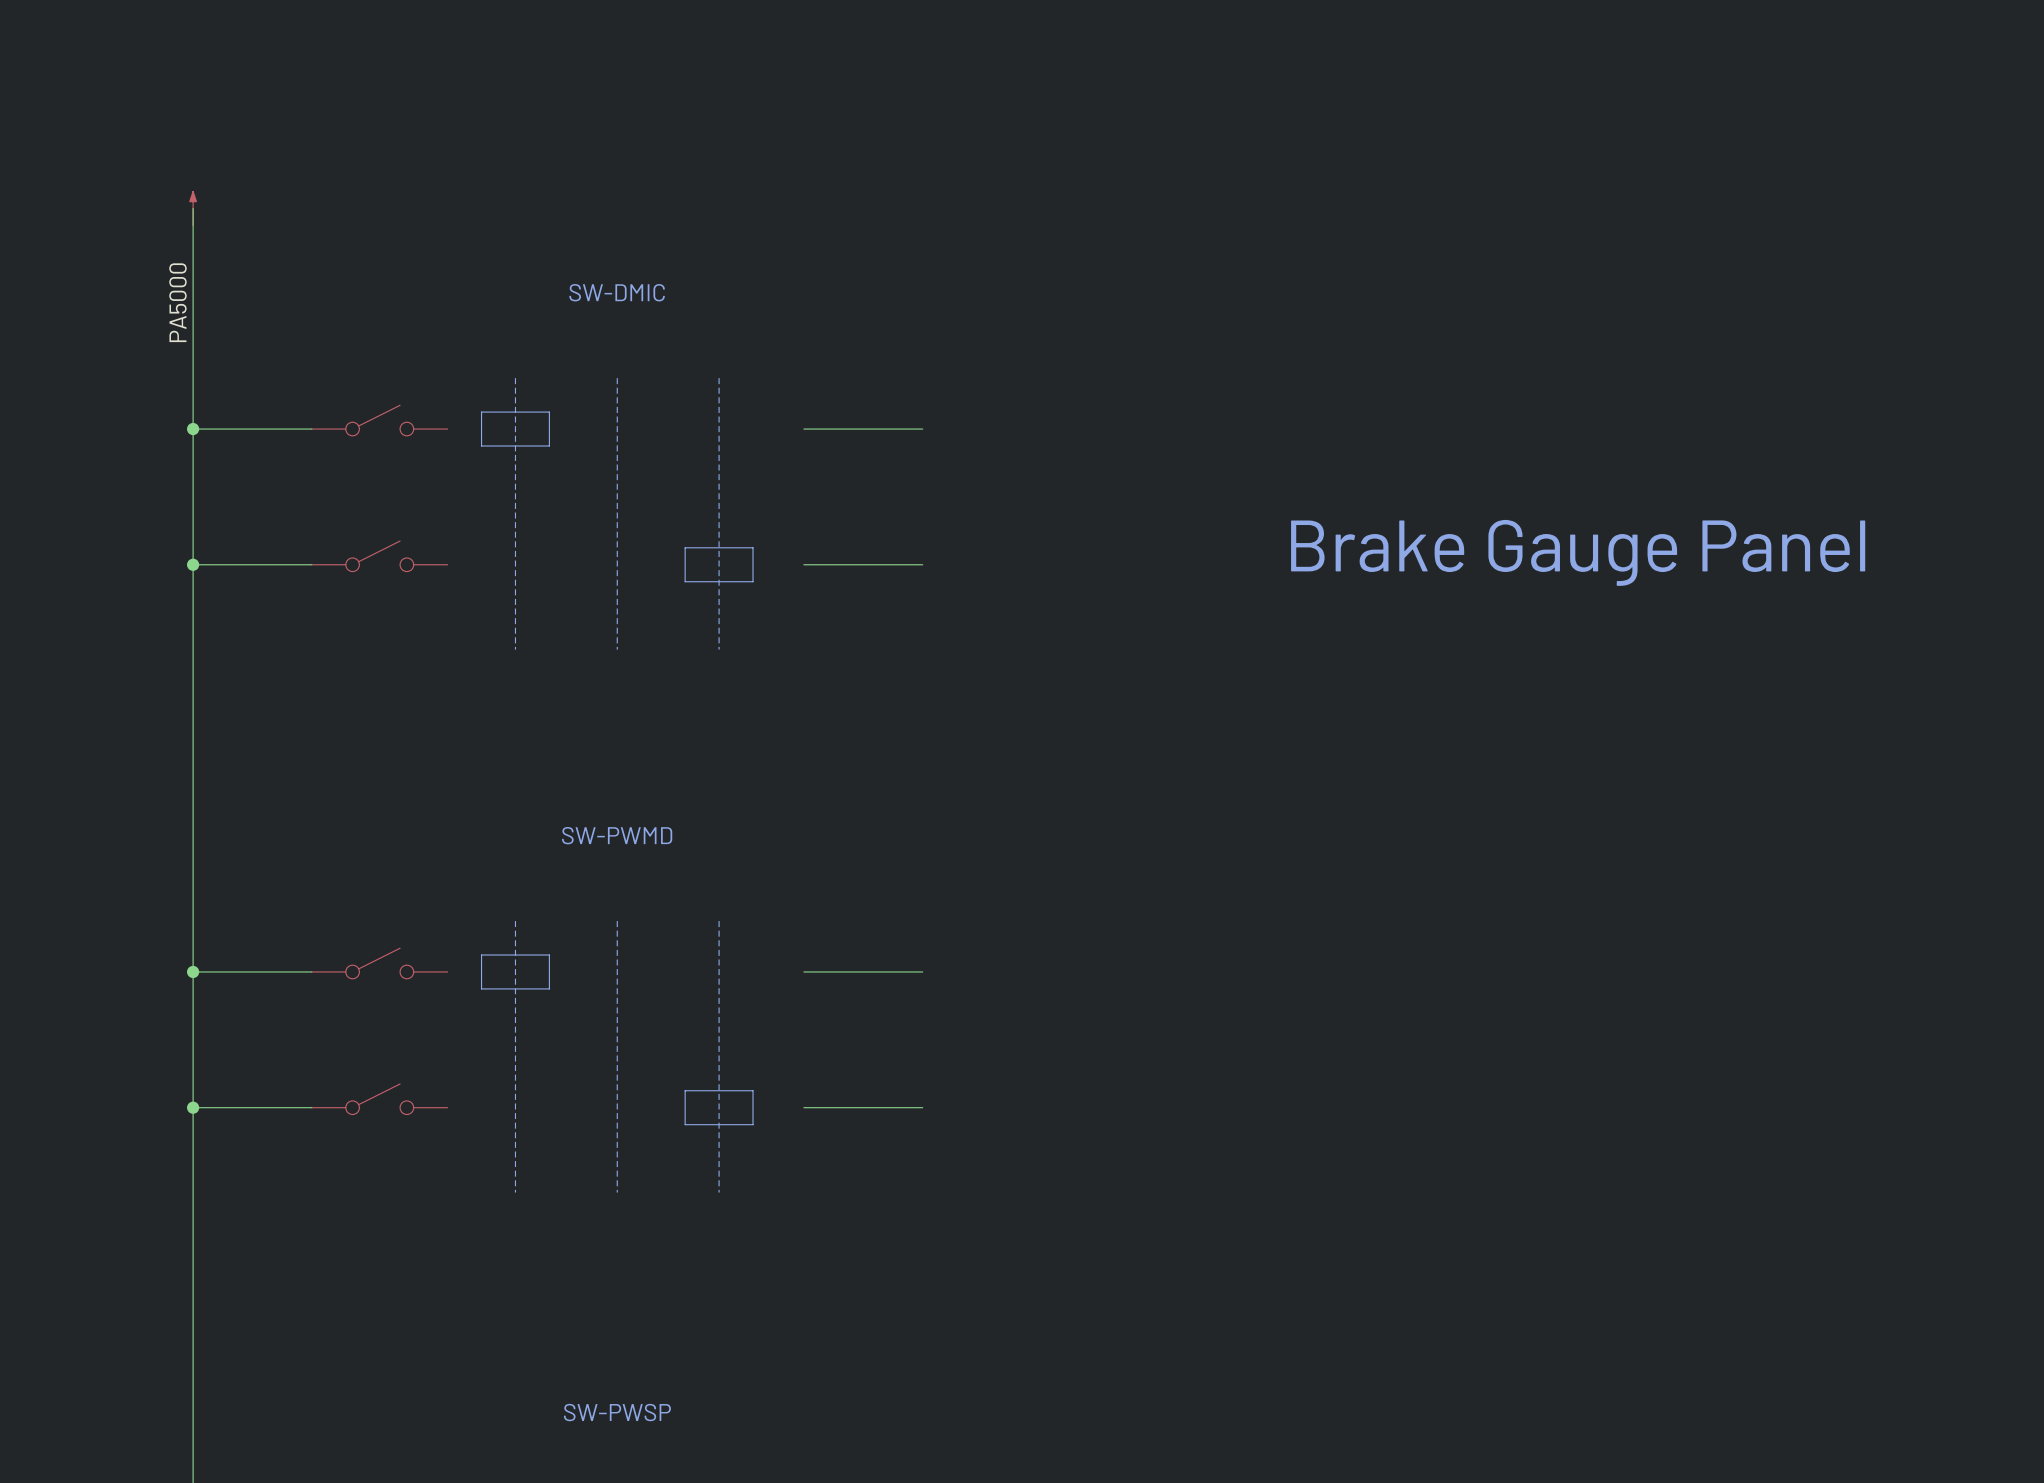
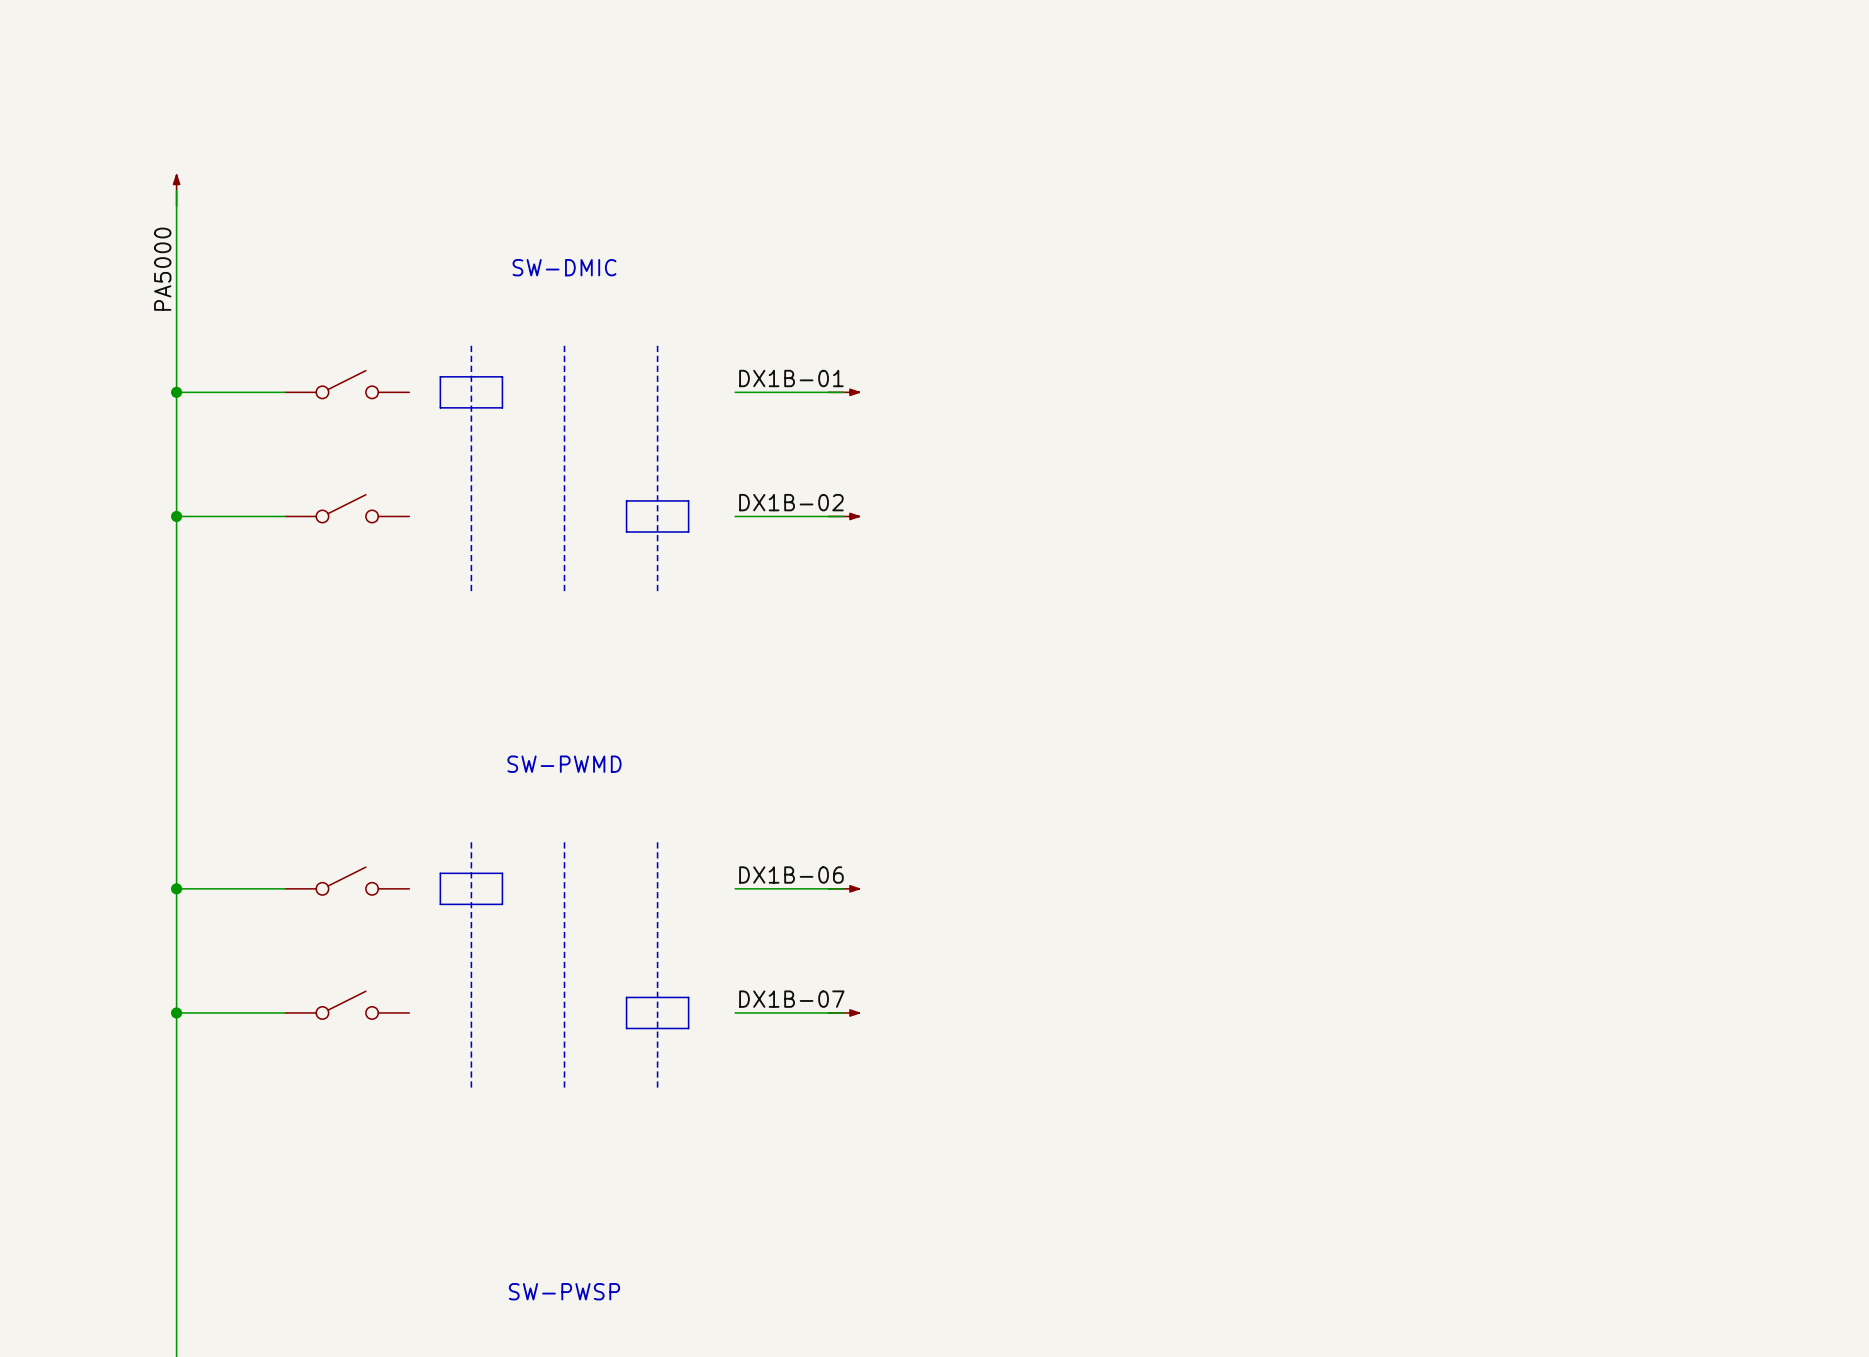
label: none -> DX1B-01 (791, 378)
power symbol: none -> (843, 392)
label: none -> DX1B-02 (791, 502)
text: Brake Gauge Panel (1578, 552) -> none
power symbol: none -> (843, 516)
label: none -> DX1B-06 (791, 875)
power symbol: none -> (843, 888)
label: none -> DX1B-07 (791, 999)
power symbol: none -> (843, 1012)

